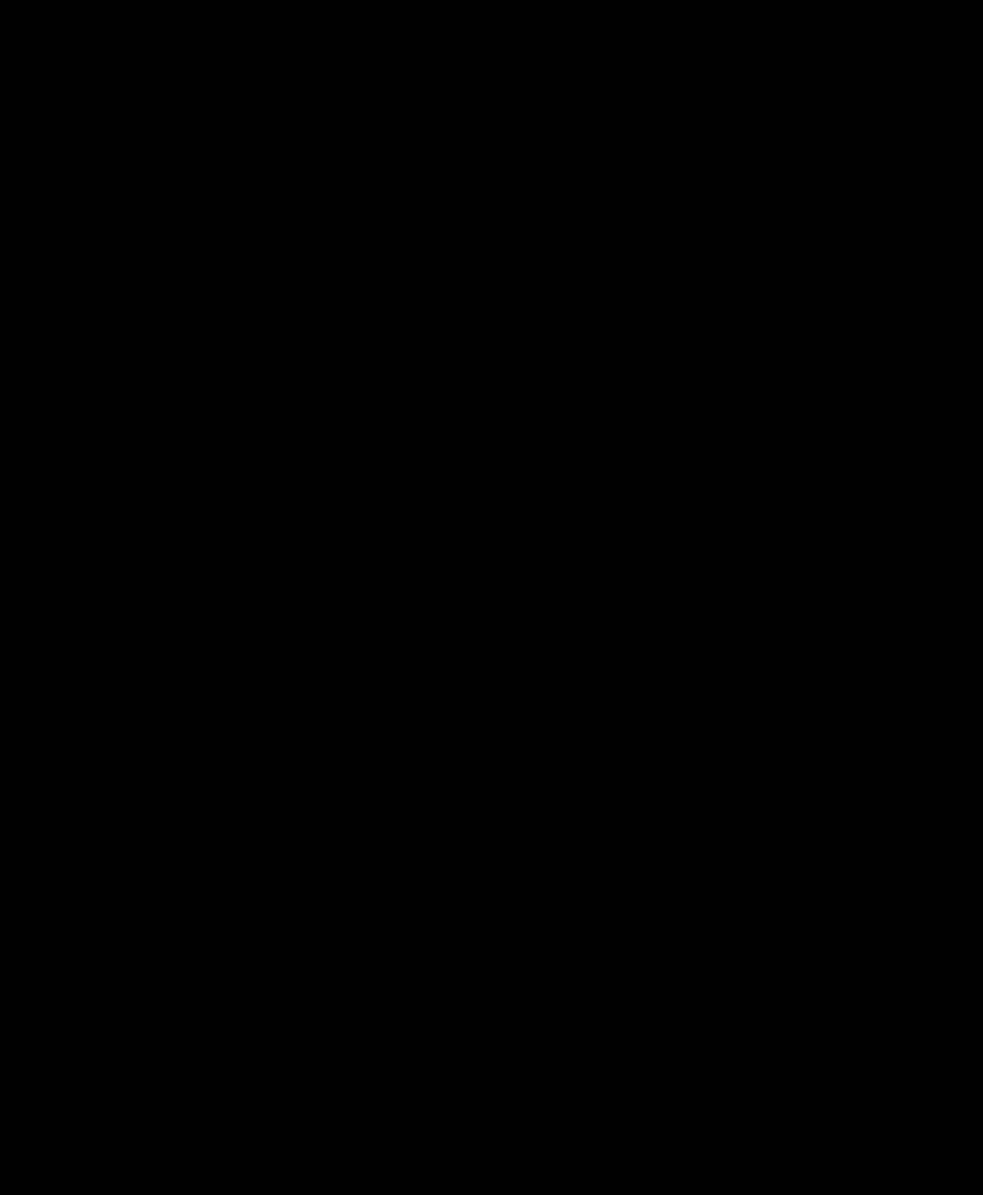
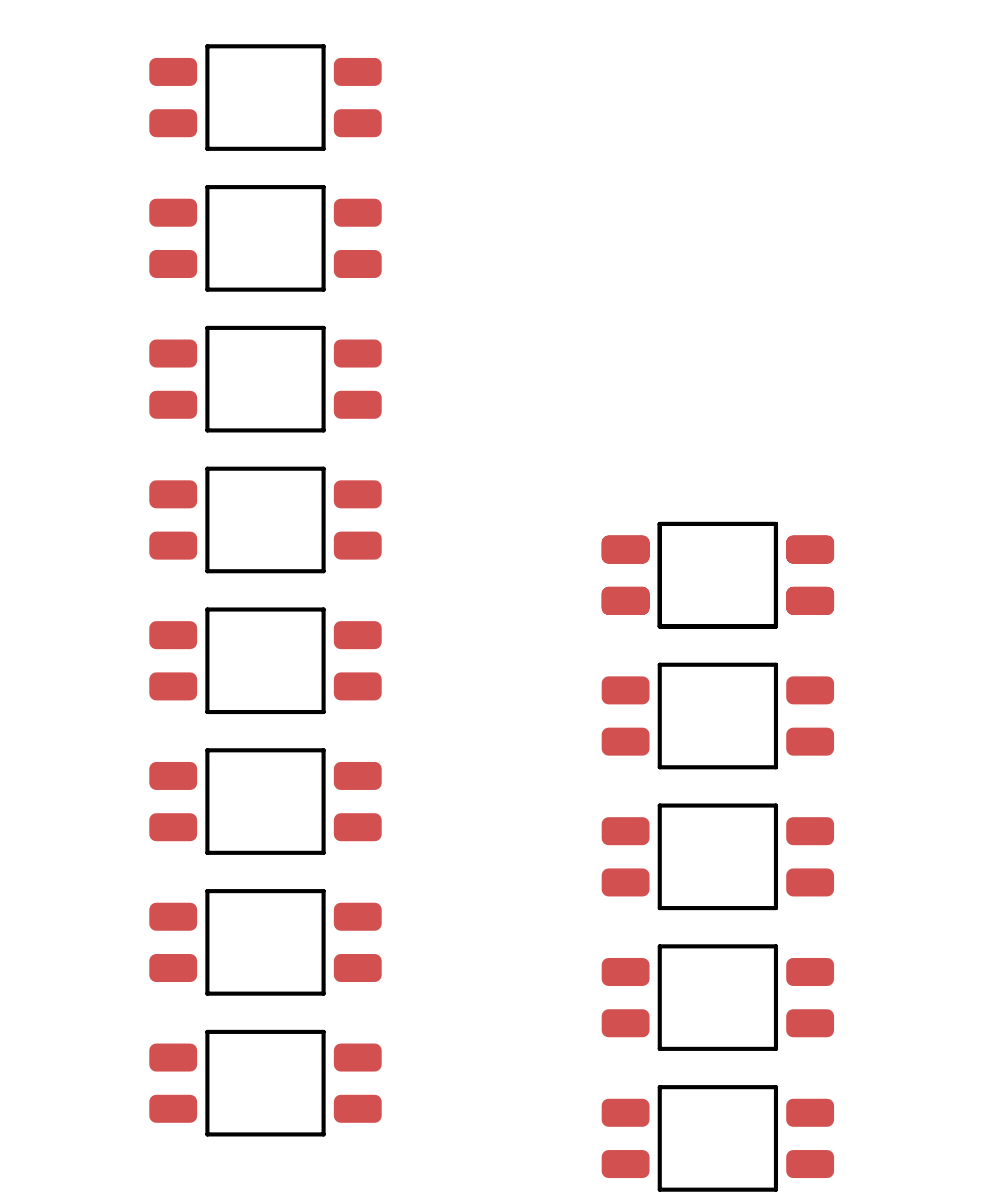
part: none -> (265, 97)
part: none -> (265, 238)
part: none -> (265, 379)
part: none -> (265, 519)
part: none -> (717, 575)
part: none -> (265, 660)
part: none -> (717, 716)
part: none -> (265, 801)
part: none -> (717, 856)
part: none -> (265, 942)
part: none -> (717, 997)
part: none -> (265, 1083)
part: none -> (717, 1138)

